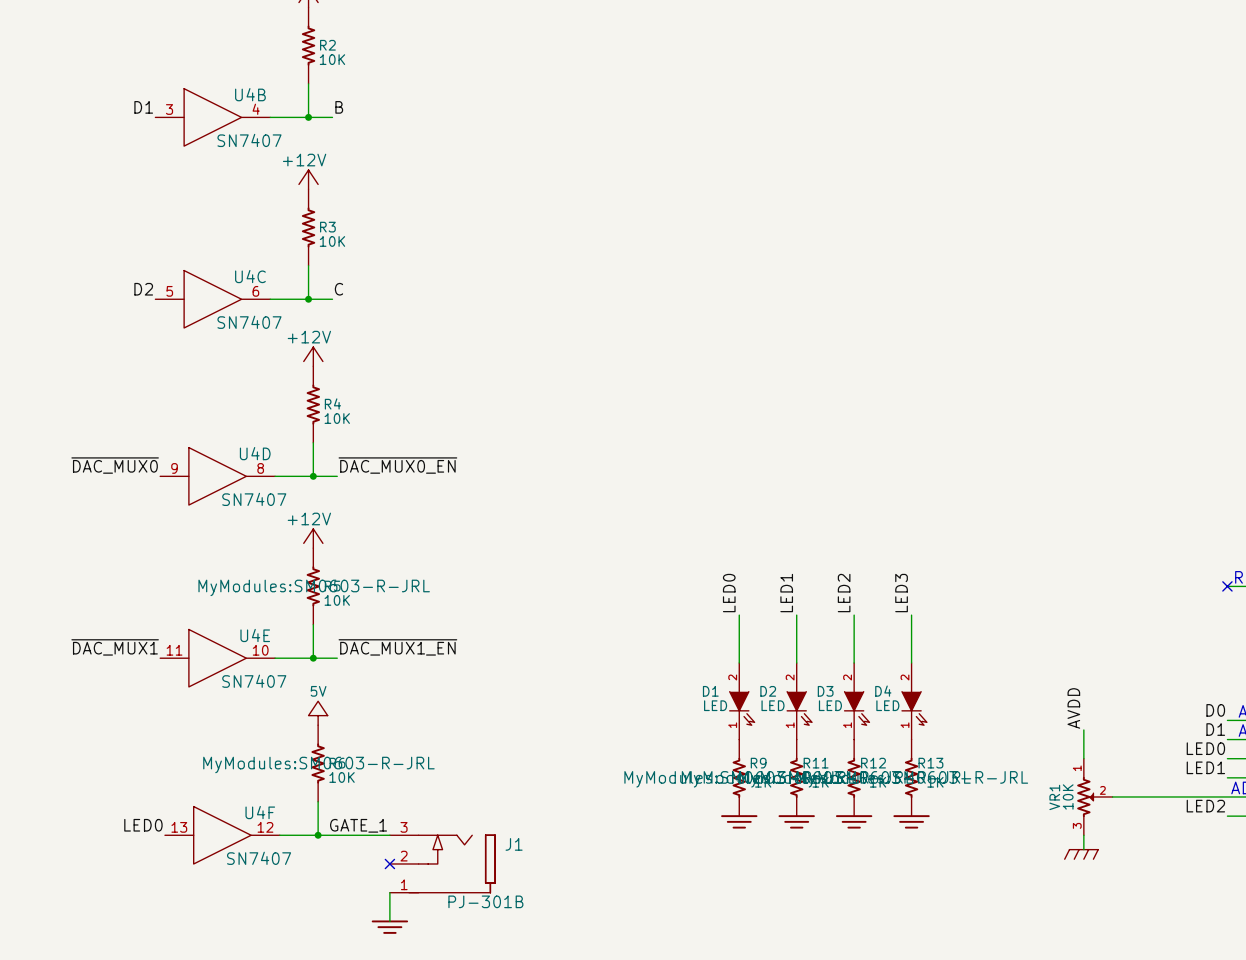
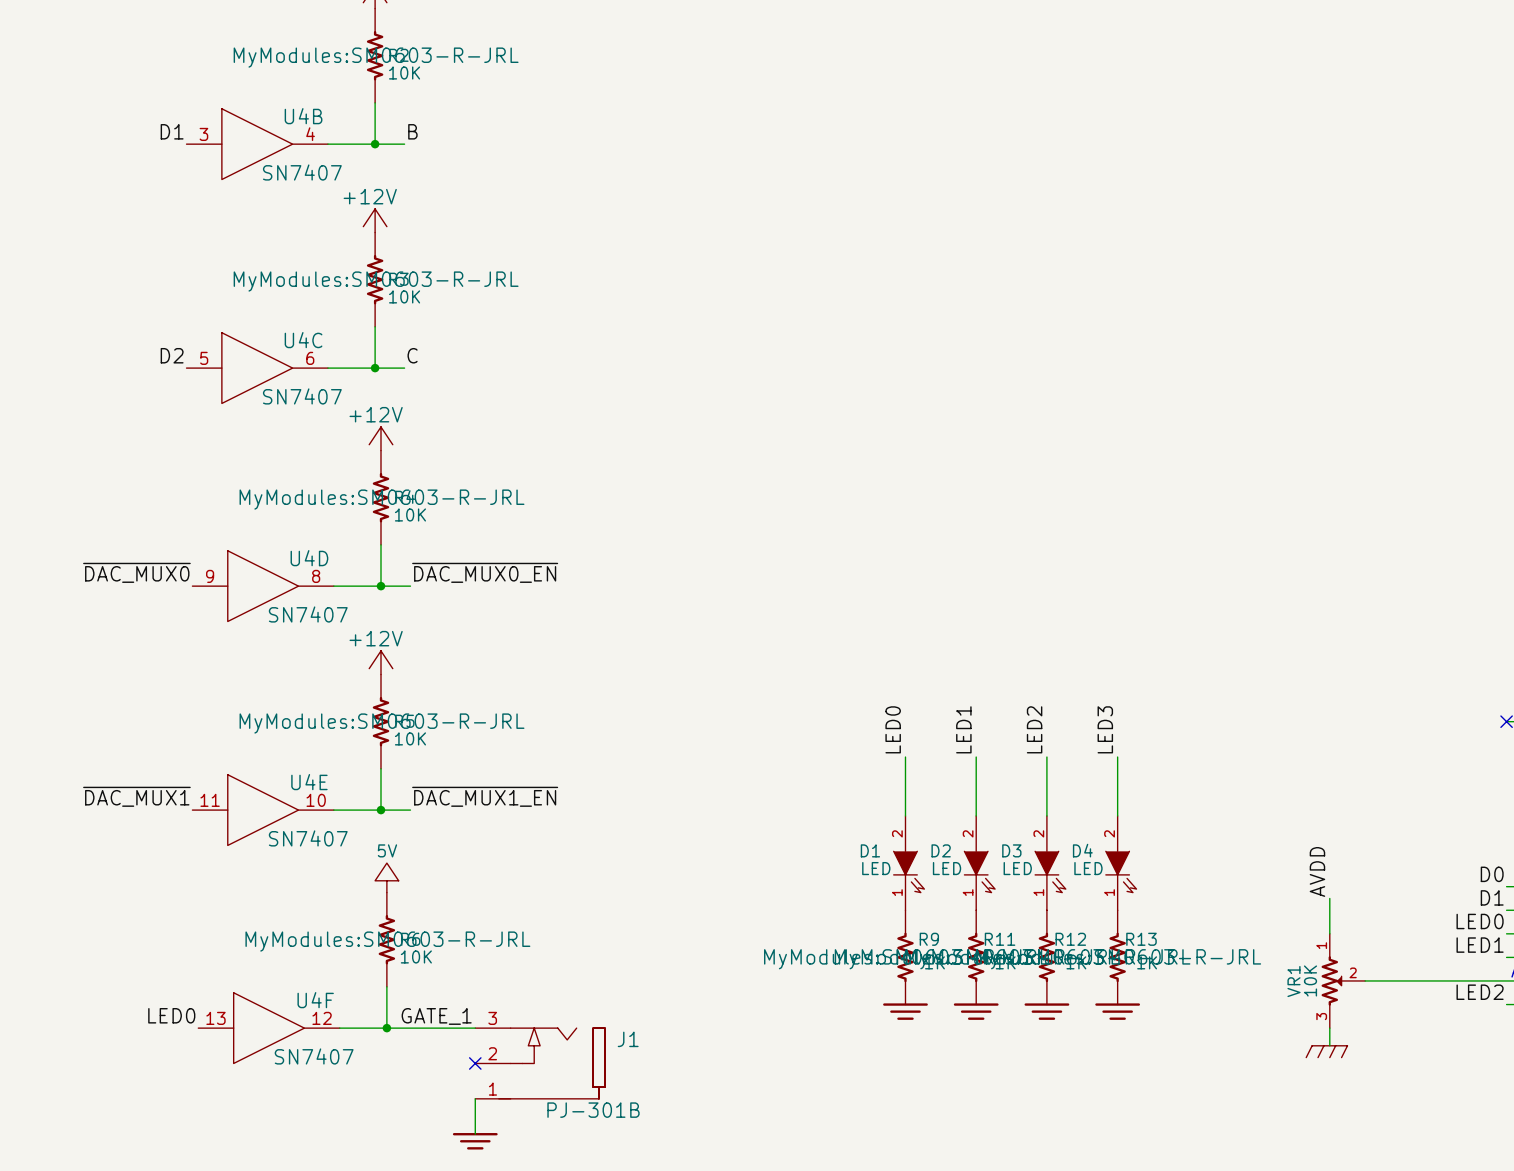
R2 text: none -> MyModules:SM0603-R-JRL (376, 57)
R3 text: none -> MyModules:SM0603-R-JRL (376, 281)
R4 text: none -> MyModules:SM0603-R-JRL (382, 499)

